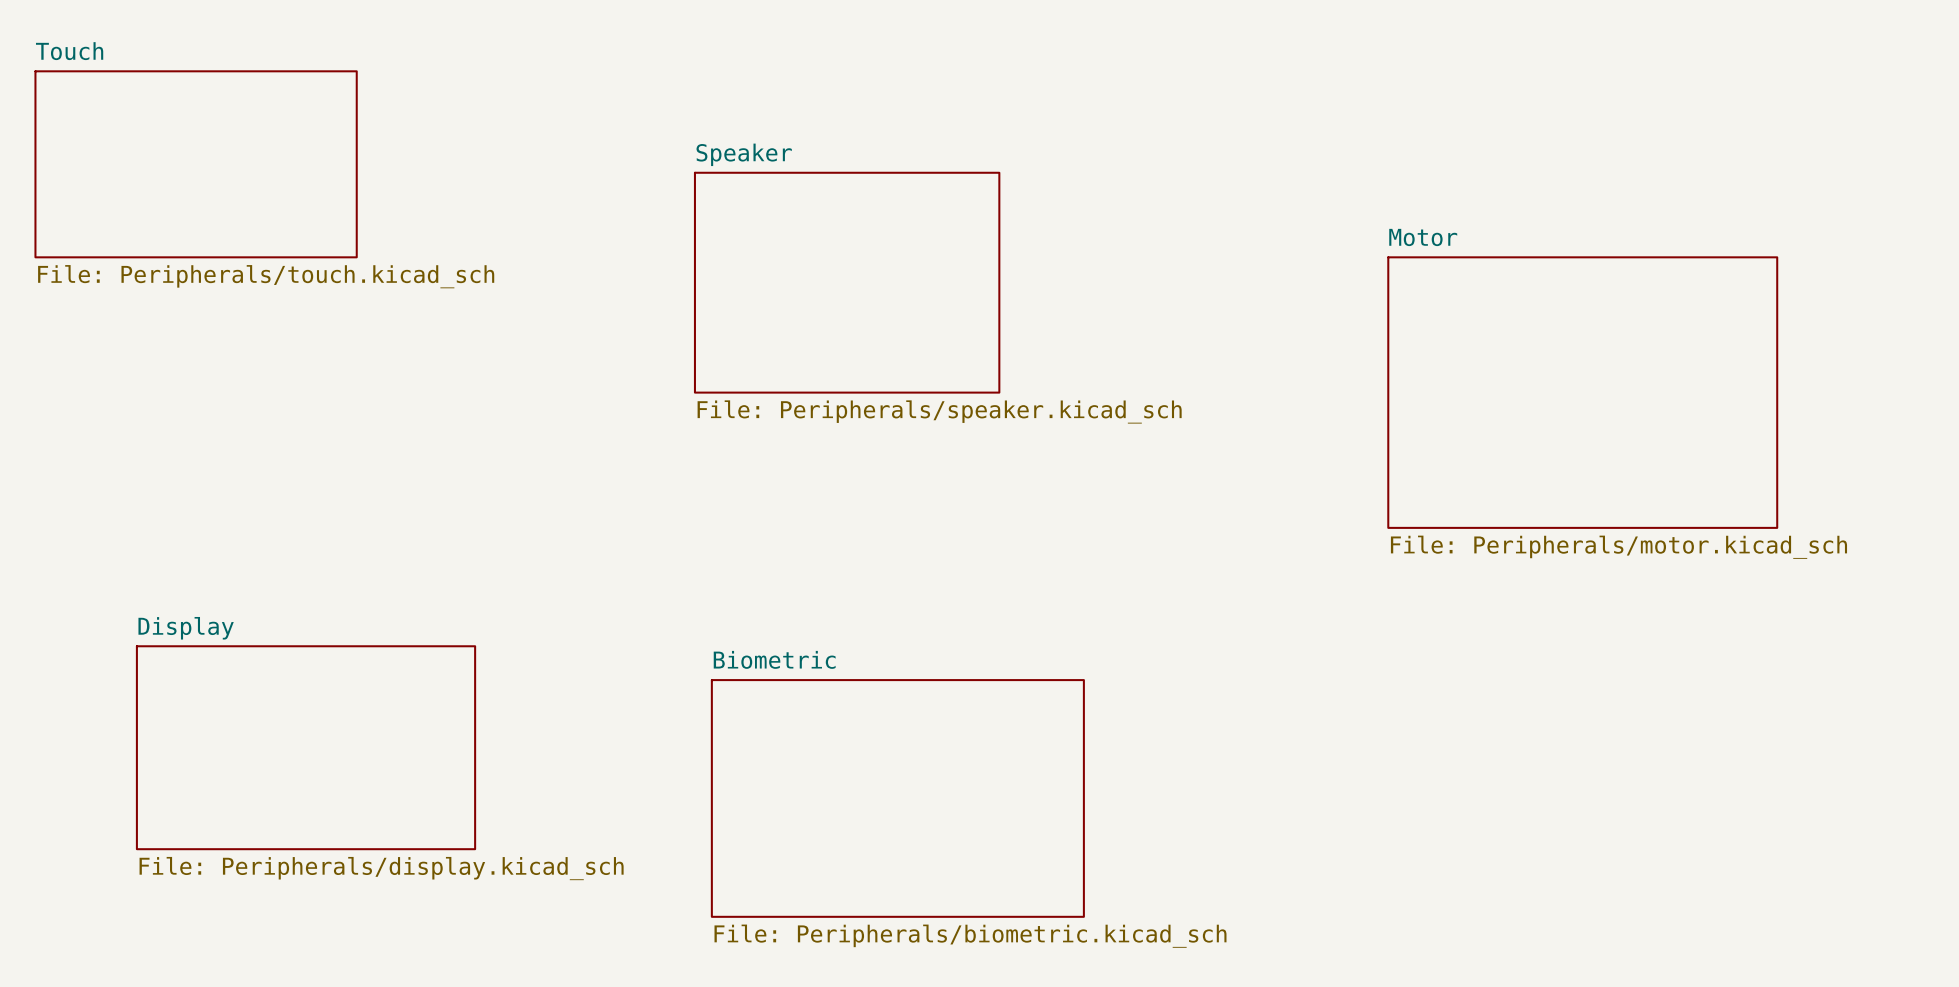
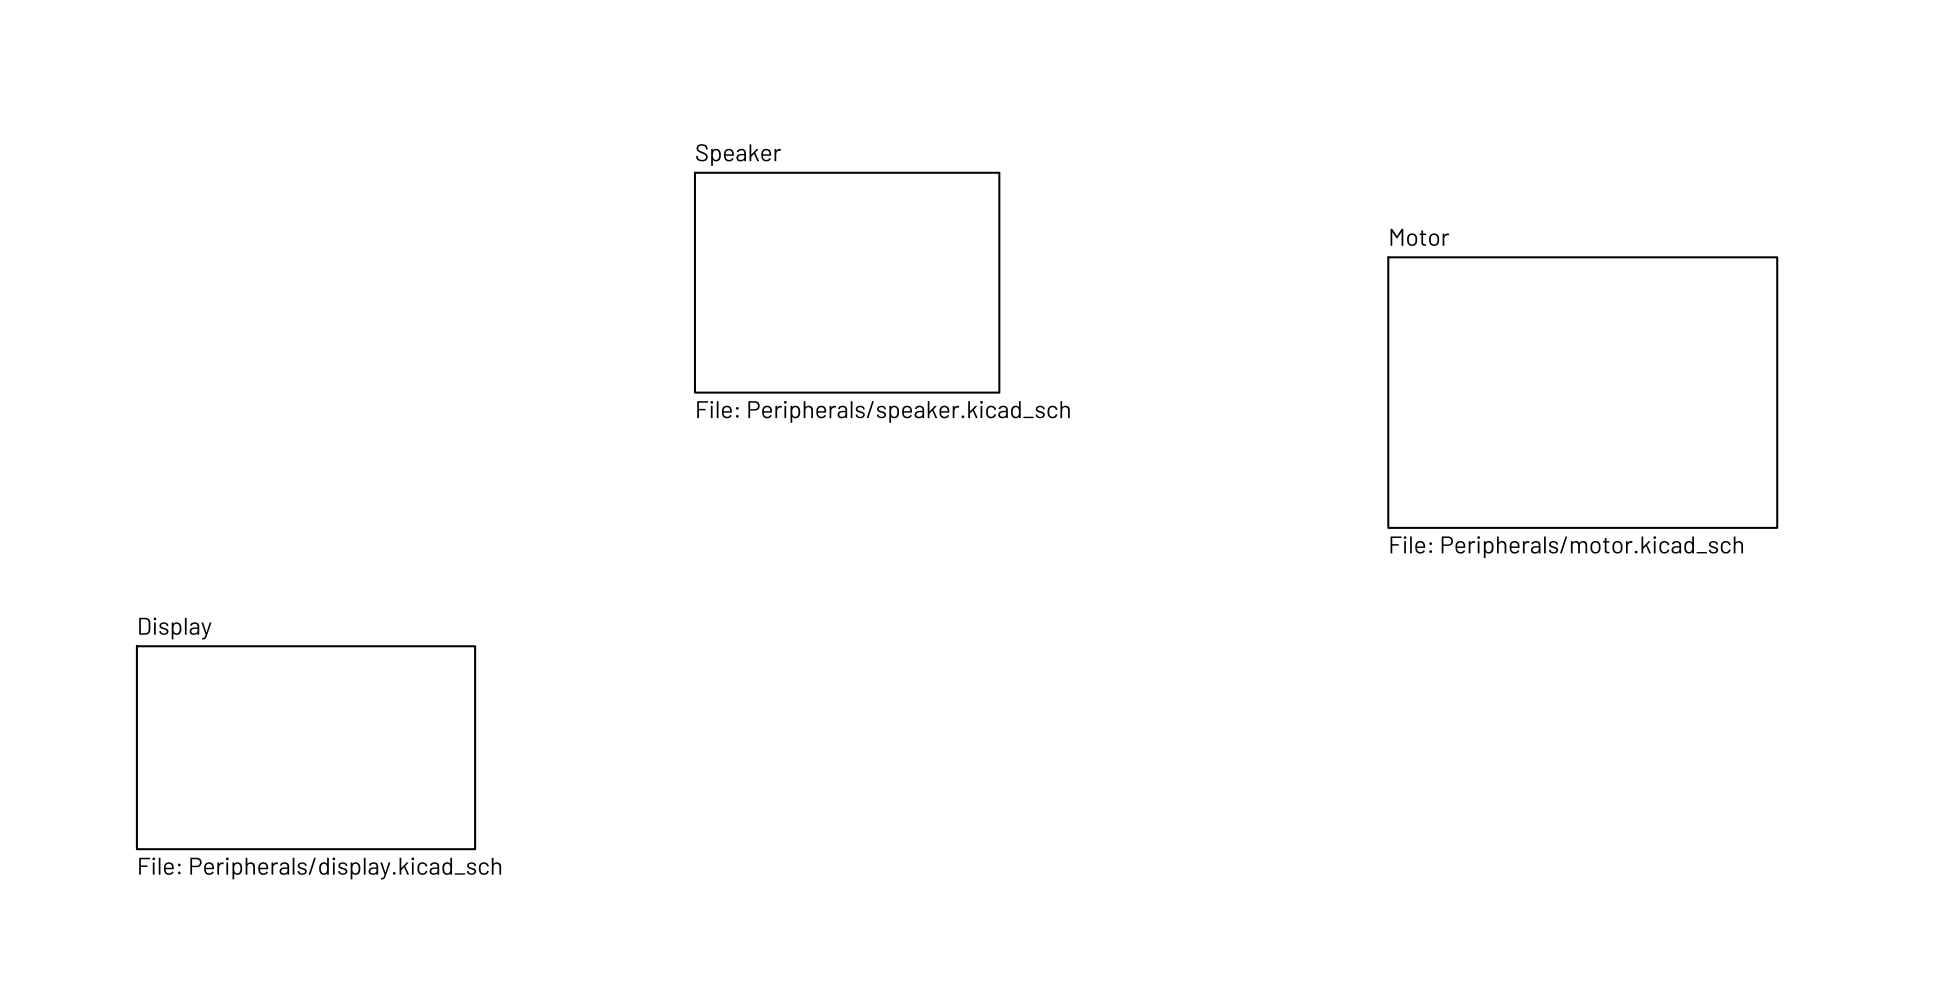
sheet Touch: File: Peripherals/touch.kicad_sch (196, 164) -> none
sheet Biometric: File: Peripherals/biometric.kicad_sch (897, 798) -> none

